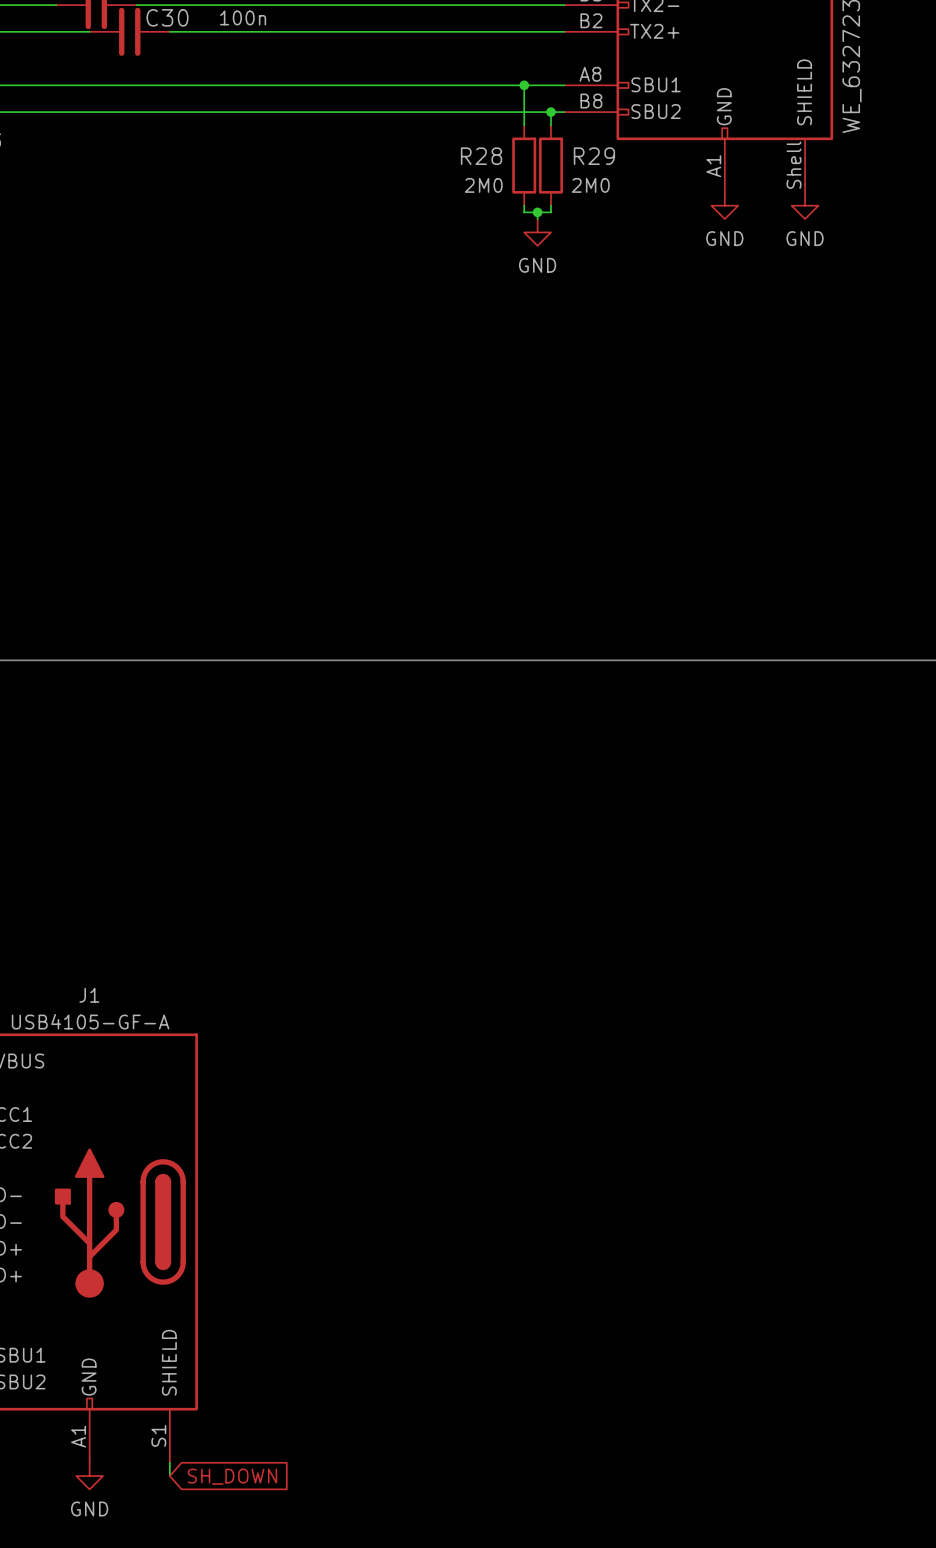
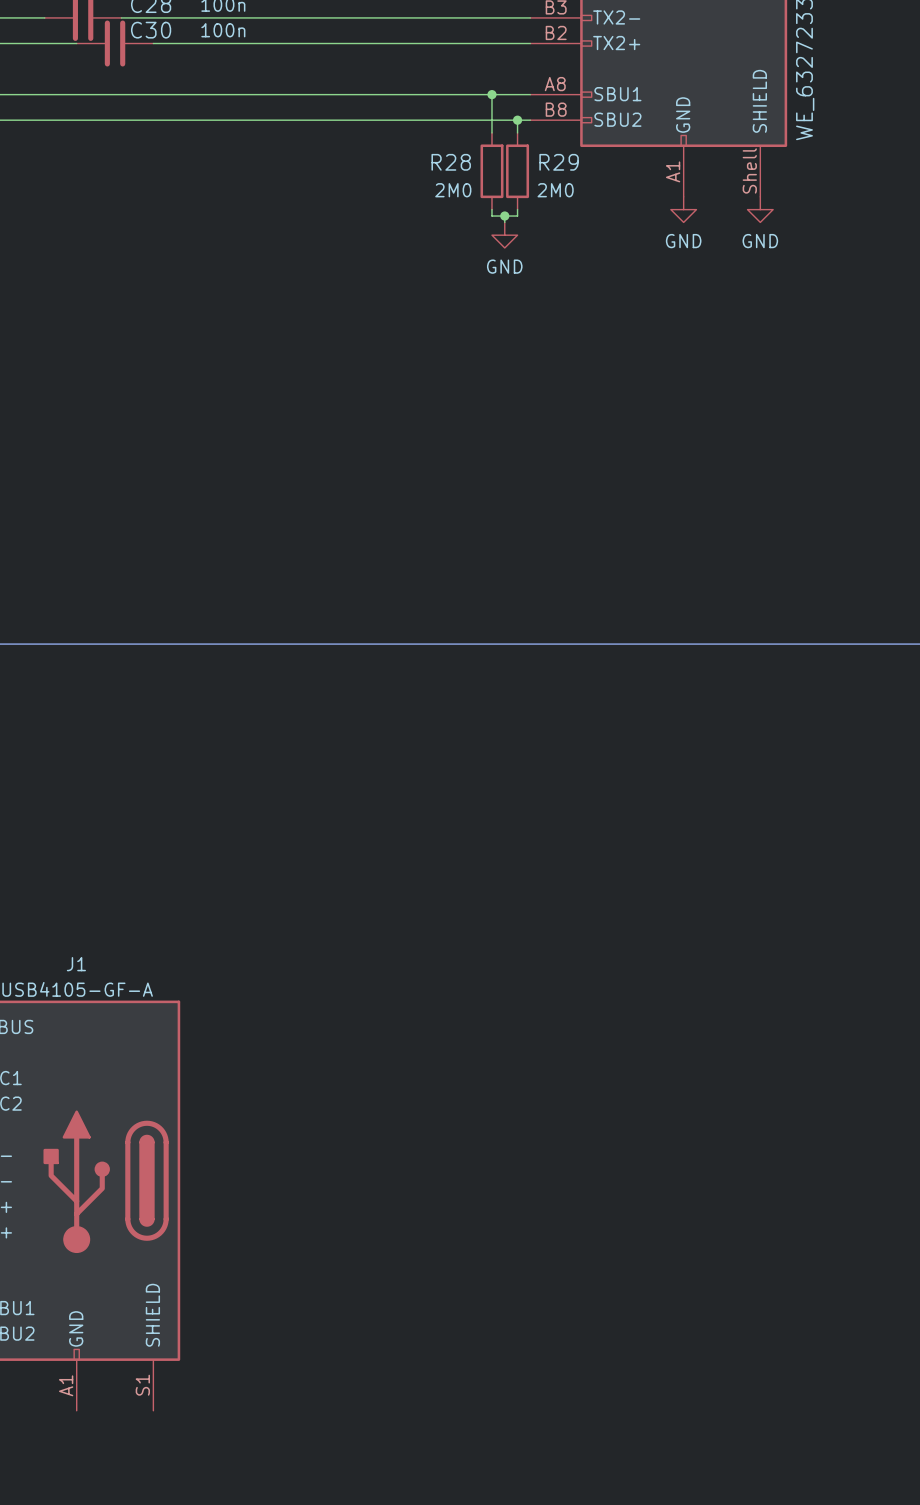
wire: (169, 1462) (169, 1476) -> none
power symbol: GND (89, 1476) -> none
global label: SH_DOWN (232, 1476) -> none

